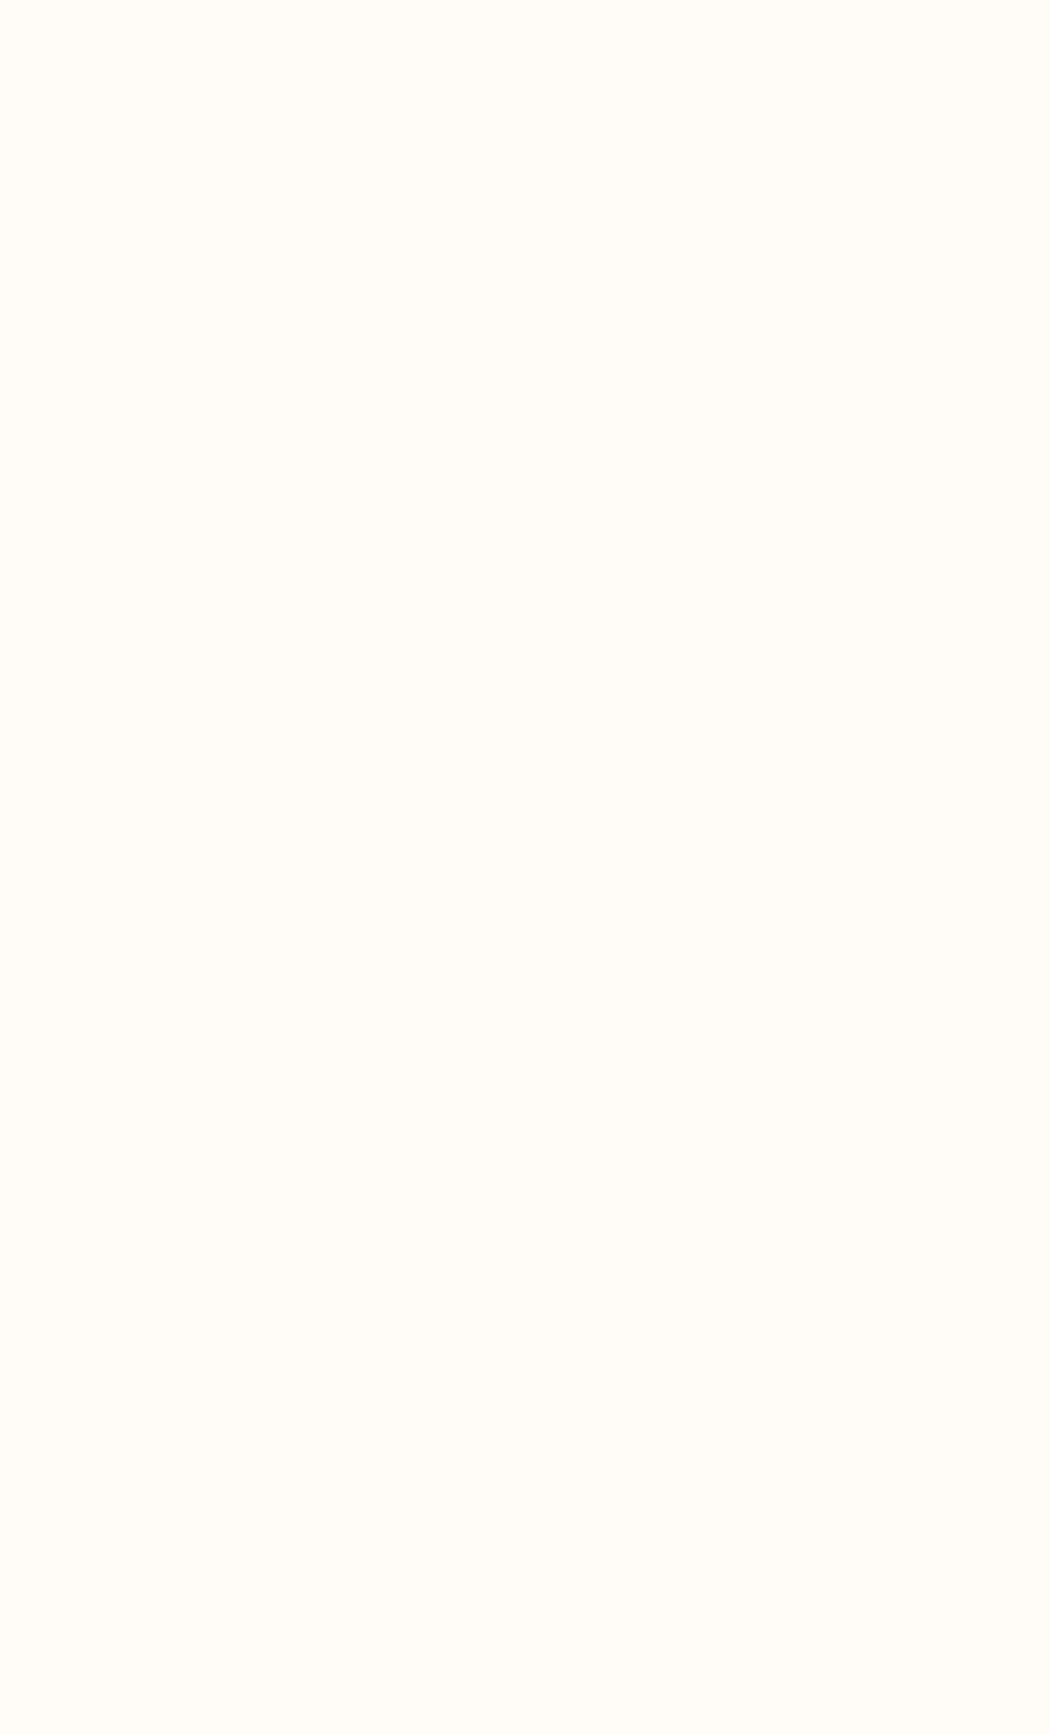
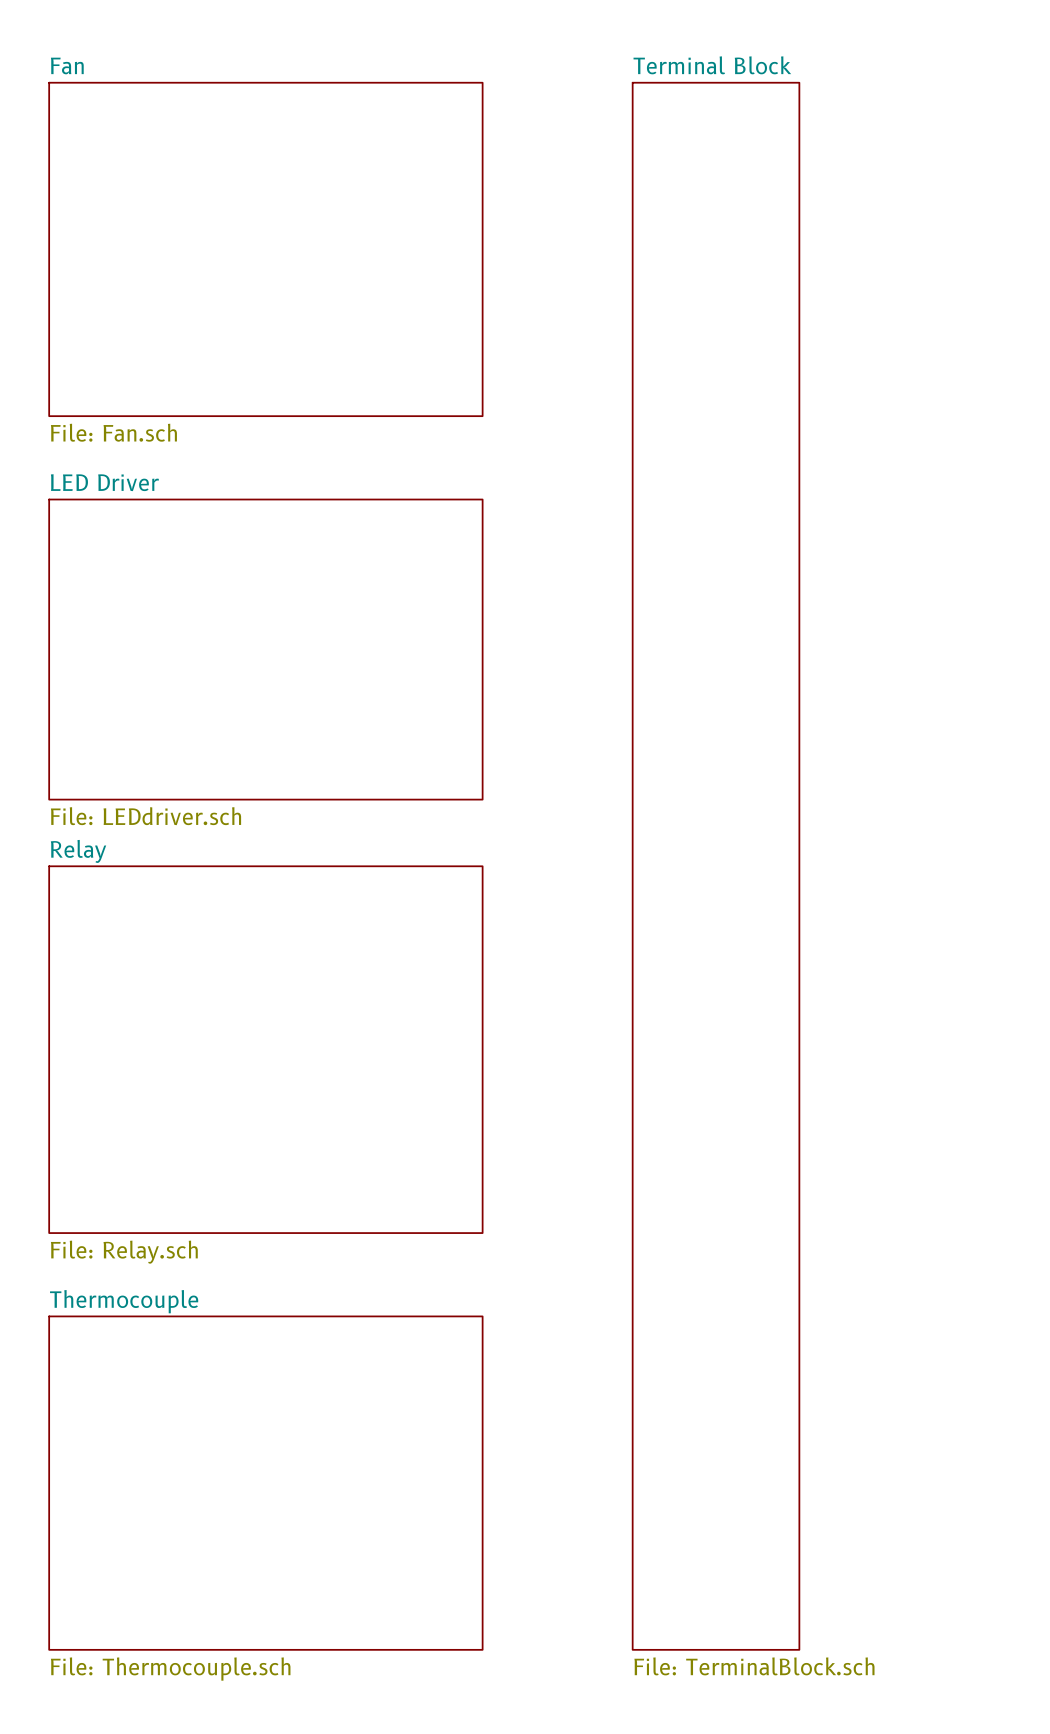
sheet Fan: none -> File: Fan.sch (265, 249)
sheet LED Driver: none -> File: LEDdriver.sch (265, 649)
sheet Terminal Block: none -> File: TerminalBlock.sch (716, 866)
sheet Relay: none -> File: Relay.sch (265, 1049)
sheet Thermocouple: none -> File: Thermocouple.sch (265, 1483)

